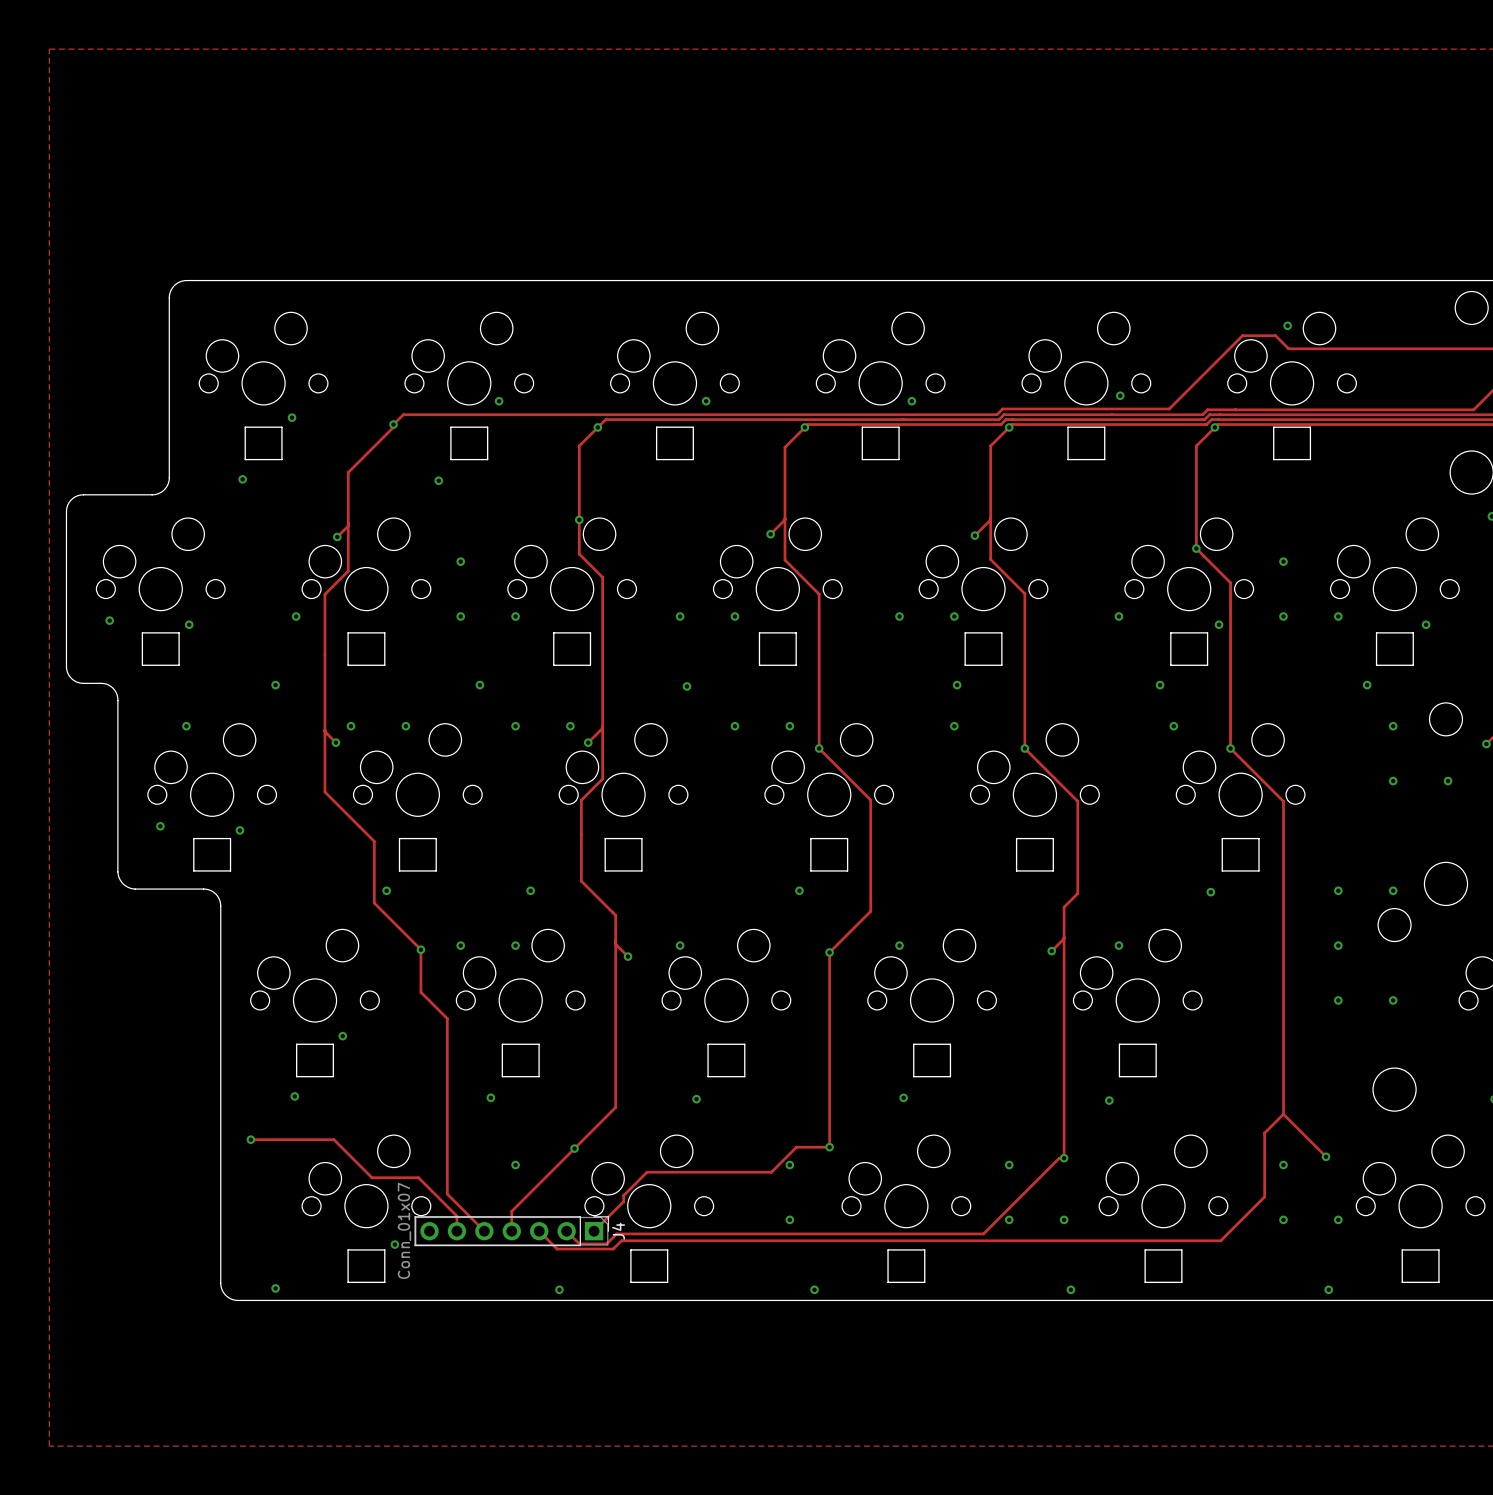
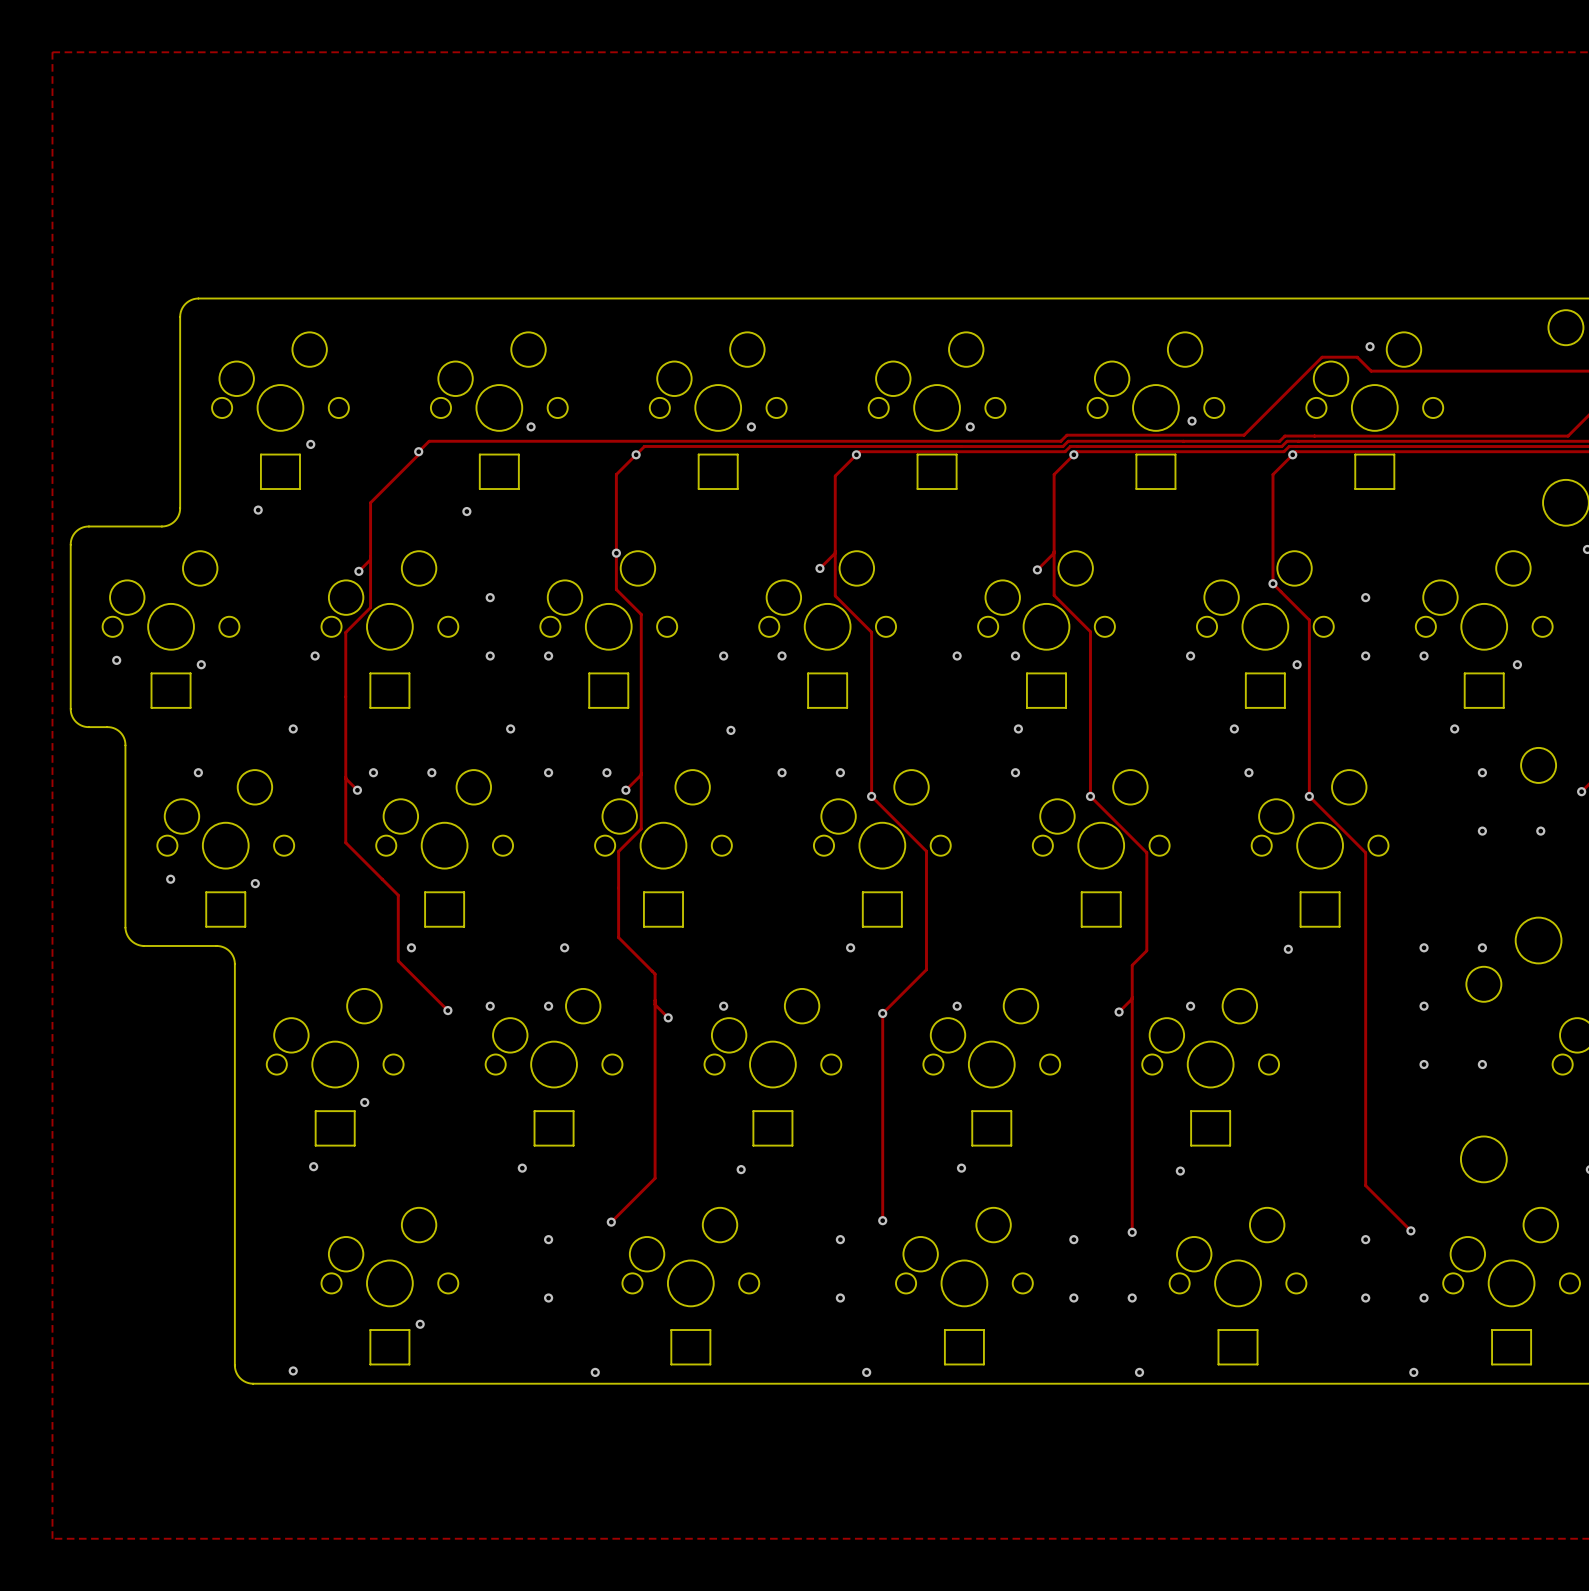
track: (420, 949) (420, 992) (447, 1018) (447, 1194) (484, 1231) -> none
track: (1283, 1114) (1264, 1133) (1264, 1196) (1220, 1240) (621, 1240) (613, 1249) (557, 1249) (539, 1231) -> none
track: (250, 1139) (333, 1139) (371, 1177) (418, 1177) (456, 1216) (456, 1231) -> none
via: (250, 1139) -> none
track: (829, 1147) (796, 1147) (771, 1172) (647, 1172) (623, 1195) (623, 1201) (594, 1231) -> none
track: (574, 1148) (511, 1211) (511, 1231) -> none
track: (1064, 1158) (1059, 1158) (983, 1233) (616, 1233) (606, 1243) (579, 1243) (566, 1231) -> none
via: none -> (548, 1298)
J4: Conn_01x07 (511, 1231) -> none

